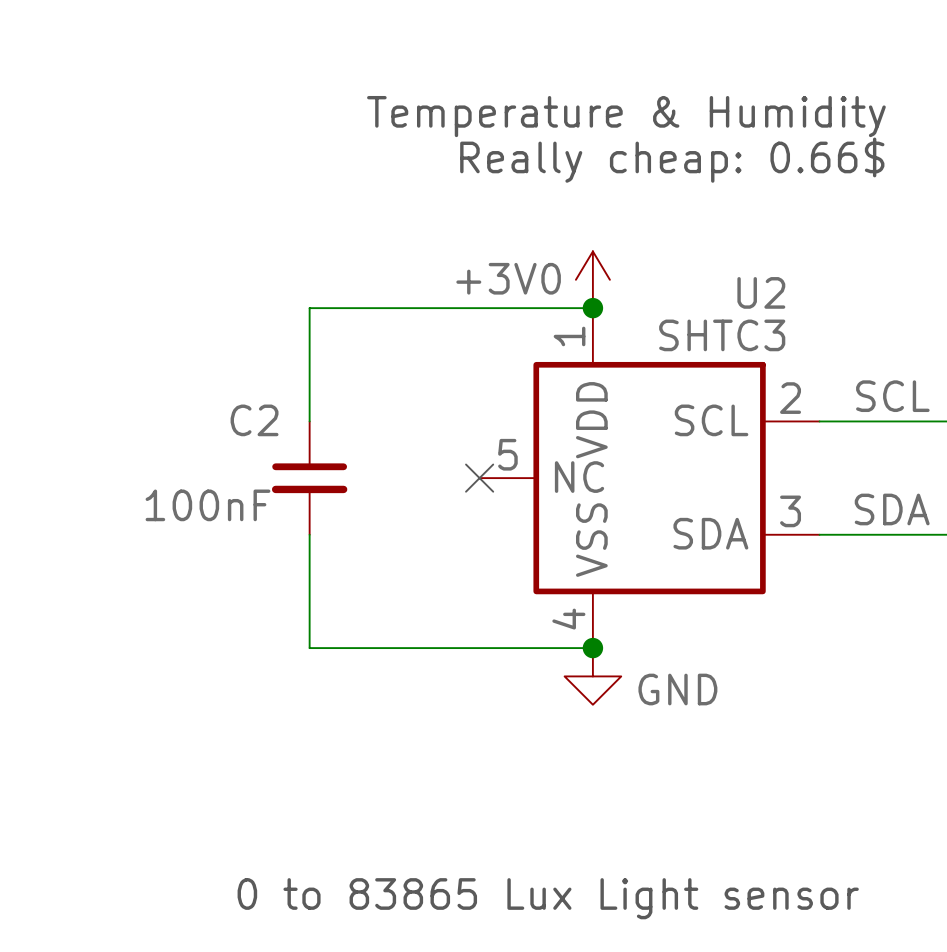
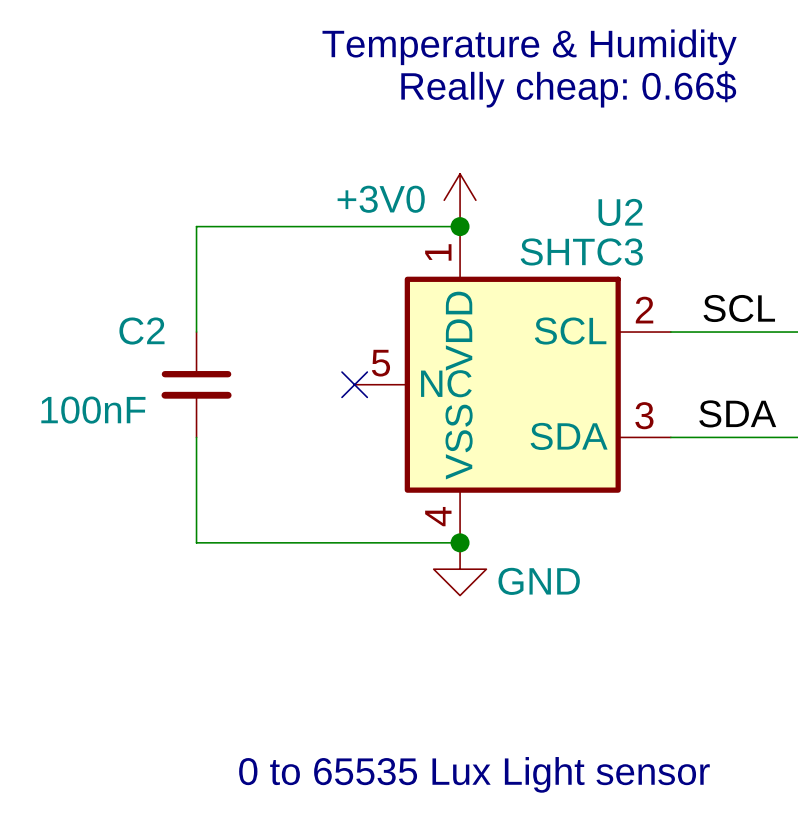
text: 0 to 83865 Lux Light sensor (548, 898) -> 0 to 65535 Lux Light sensor (474, 774)

